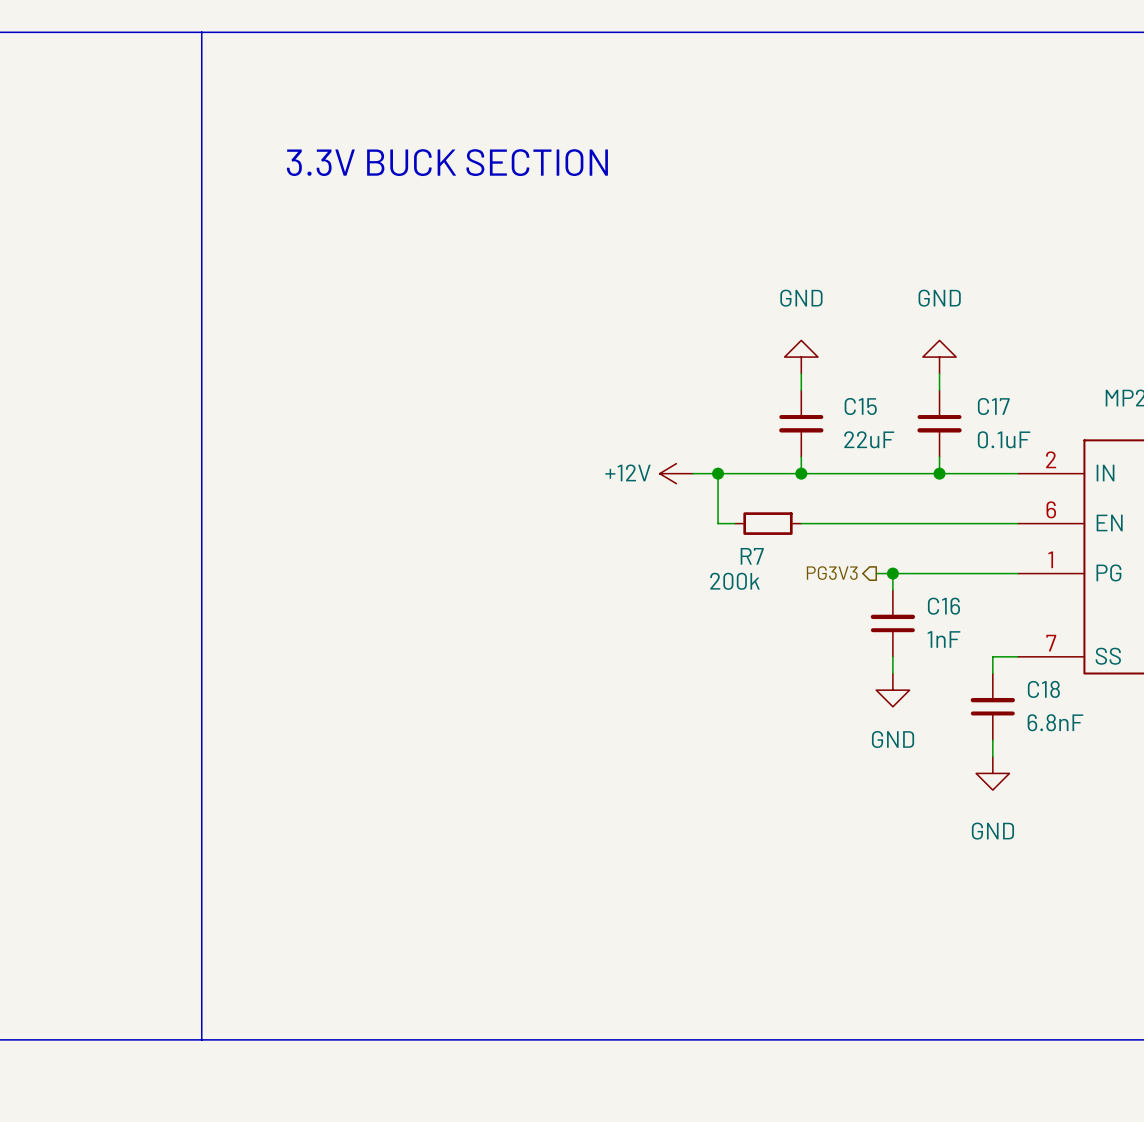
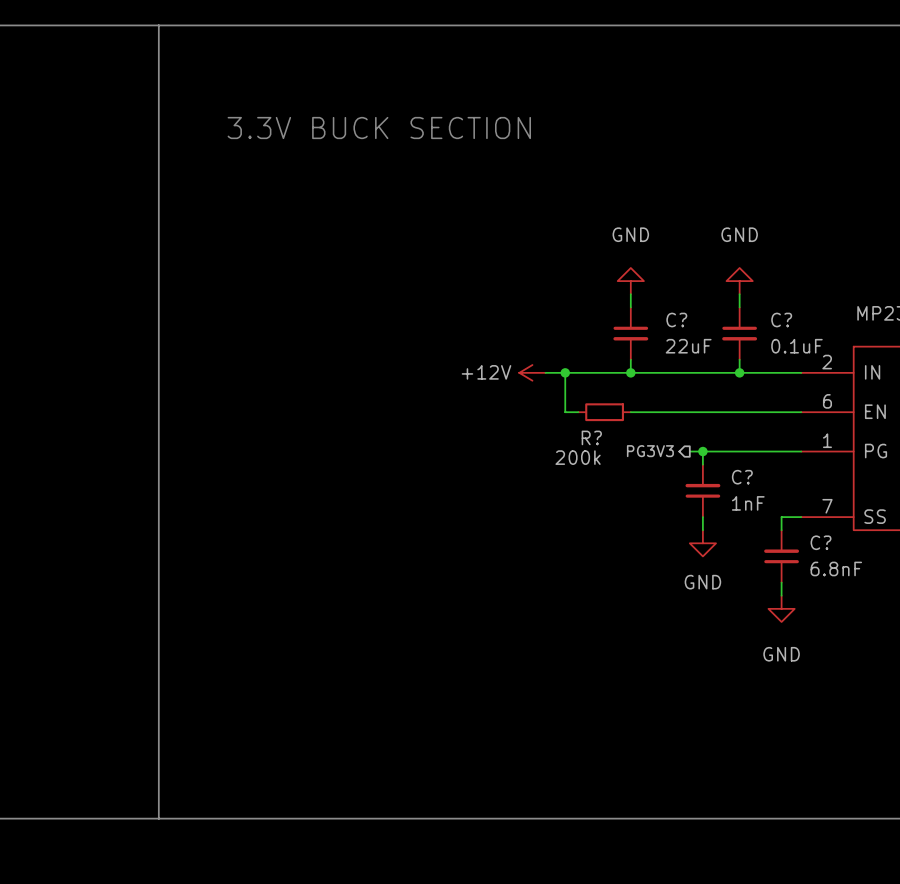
C15 name: C15 (860, 406) -> C? (676, 320)
C17 name: C17 (993, 406) -> C? (781, 320)
R7 name: R7 (752, 556) -> R? (591, 437)
C16 name: C16 (943, 606) -> C? (742, 477)
C18 name: C18 (1043, 689) -> C? (821, 542)

